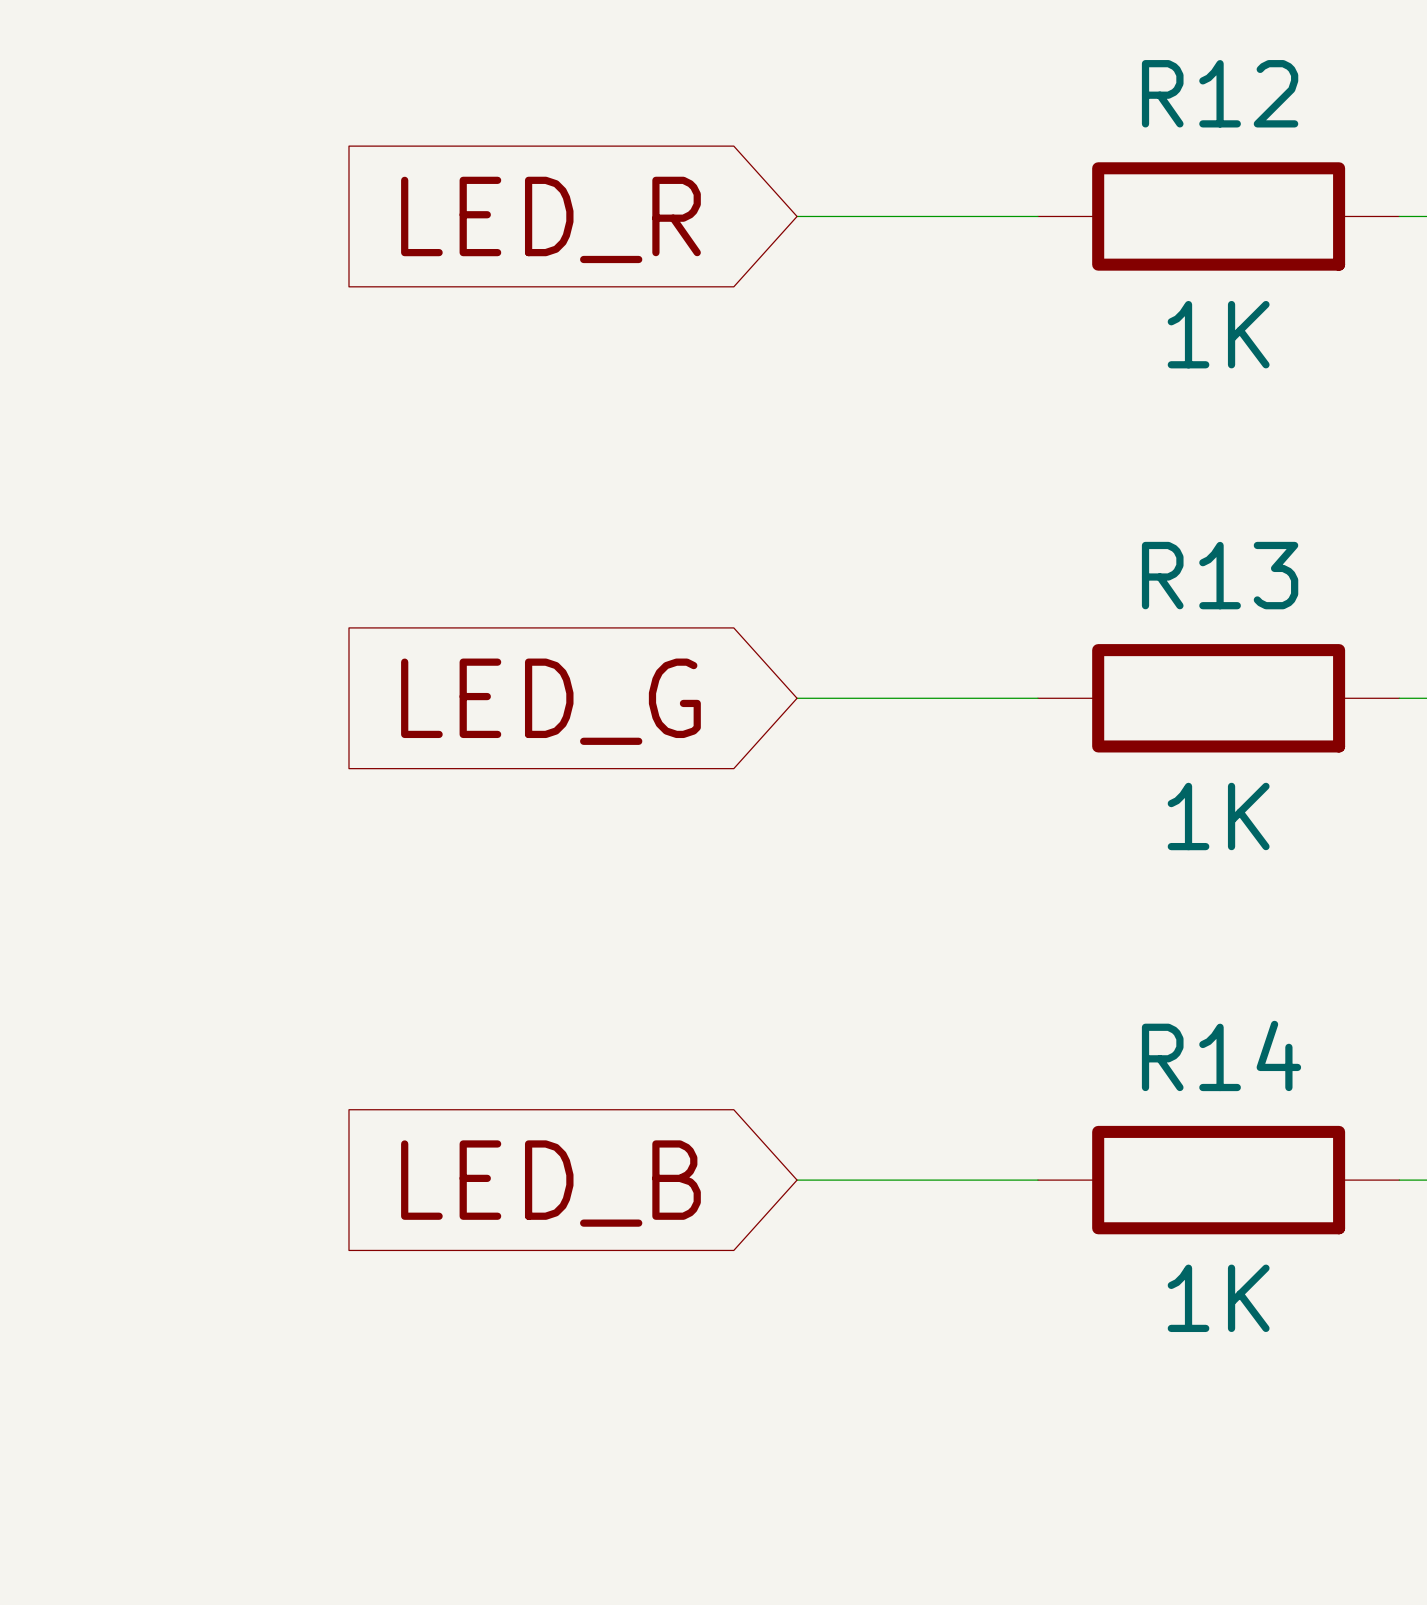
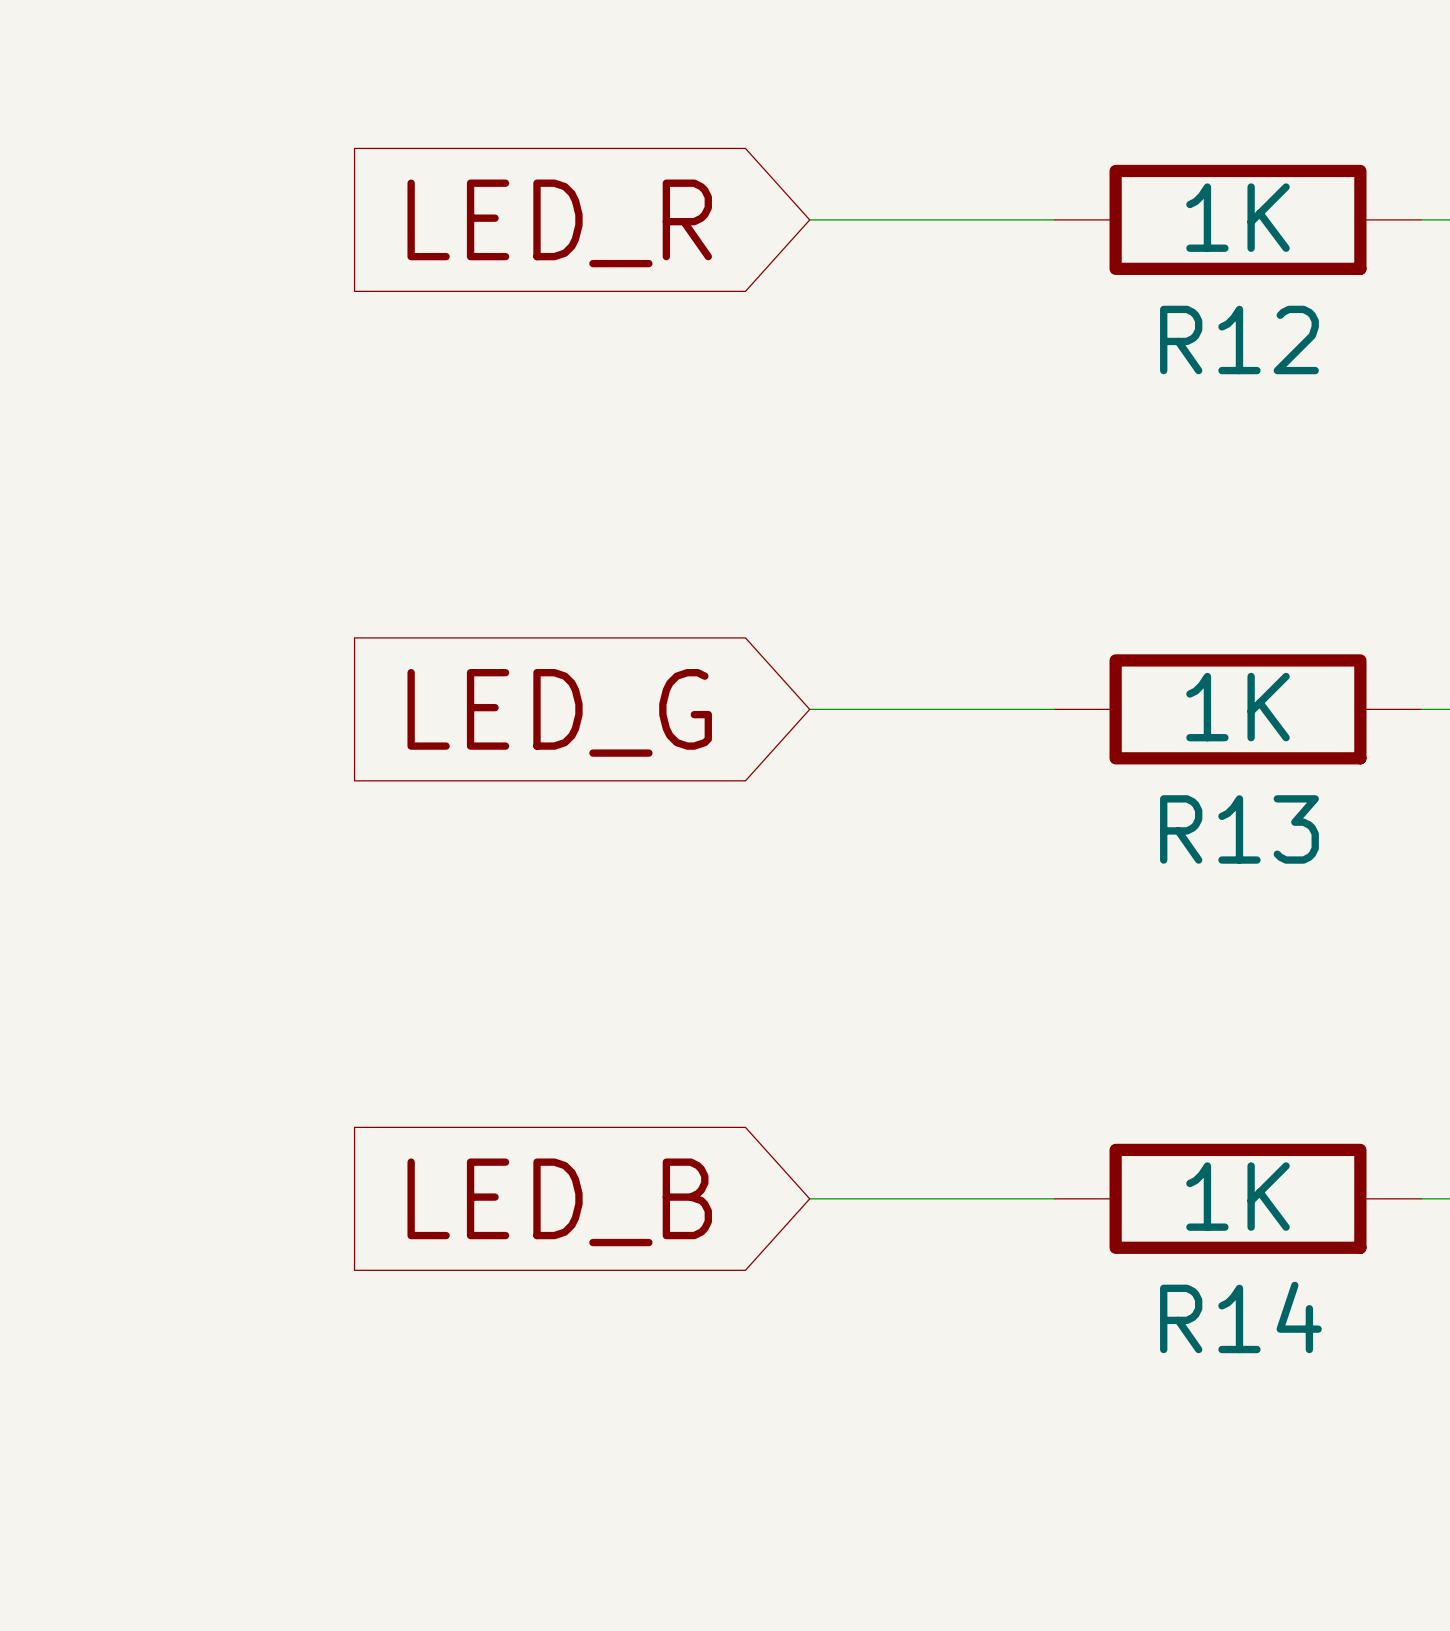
R12 name position: R12 (1220, 93) -> R12 (1239, 339)
R12 value position: 1K (1218, 334) -> 1K (1238, 217)
R13 name position: R13 (1220, 575) -> R13 (1239, 829)
R13 value position: 1K (1218, 816) -> 1K (1238, 707)
R14 name position: R14 (1221, 1055) -> R14 (1240, 1317)
R14 value position: 1K (1218, 1298) -> 1K (1238, 1196)

